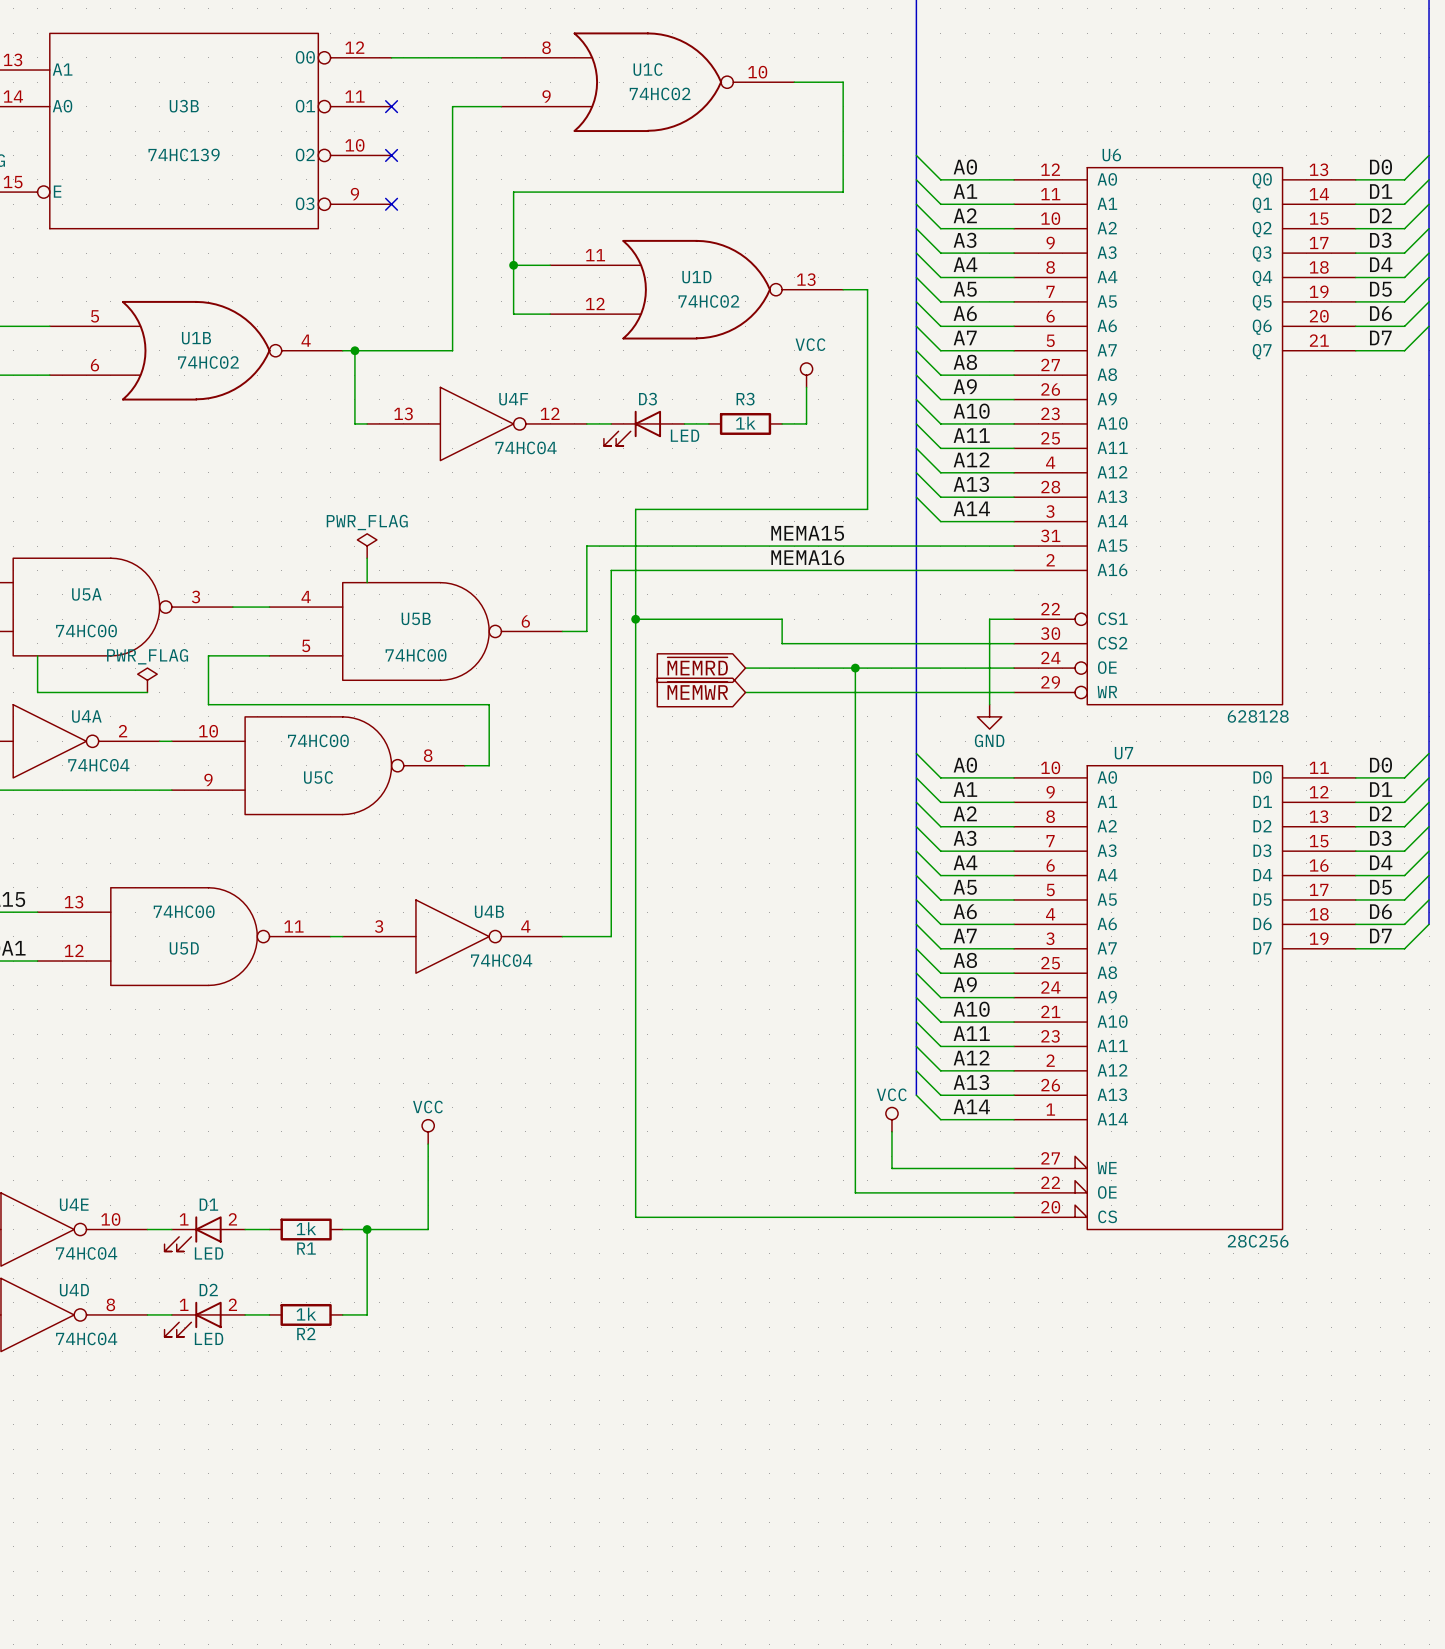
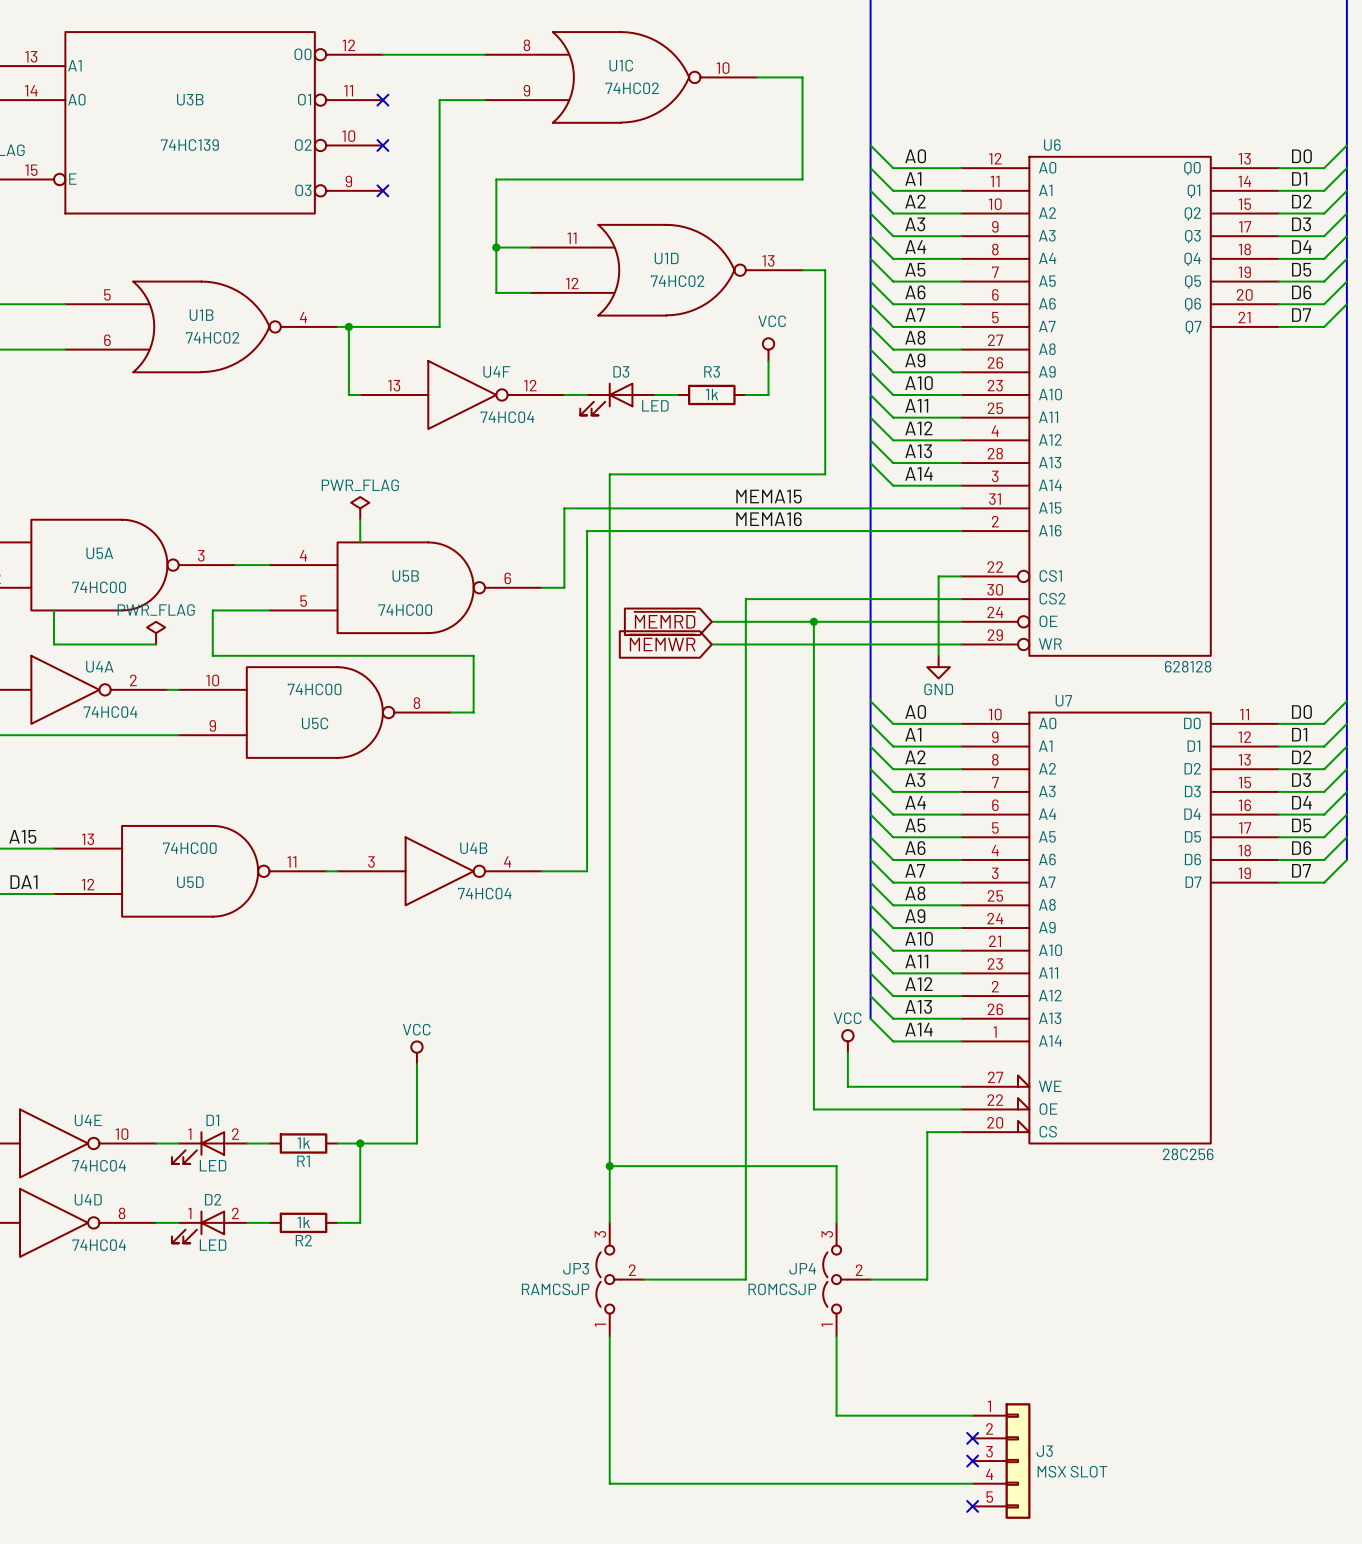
wire: (635, 619) (782, 619) (782, 643) -> (643, 1279) (745, 1279) (745, 599)
junction: (635, 619) -> none
wire: (635, 1217) (977, 1217) -> (870, 1279) (927, 1279) (927, 1132)
wire: none -> (609, 1132) (609, 1222)
wire: none -> (609, 1166) (836, 1166) (836, 1222)
junction: none -> (609, 1166)
JP3: none -> RAMCSJP (620, 1279)
JP4: none -> ROMCSJP (846, 1279)
wire: none -> (609, 1336) (609, 1483) (972, 1483)
wire: none -> (836, 1336) (836, 1415) (972, 1415)
no-connect mark: none -> (972, 1438)
no-connect mark: none -> (972, 1461)
J3: none -> MSX SLOT (1001, 1461)
no-connect mark: none -> (972, 1506)

